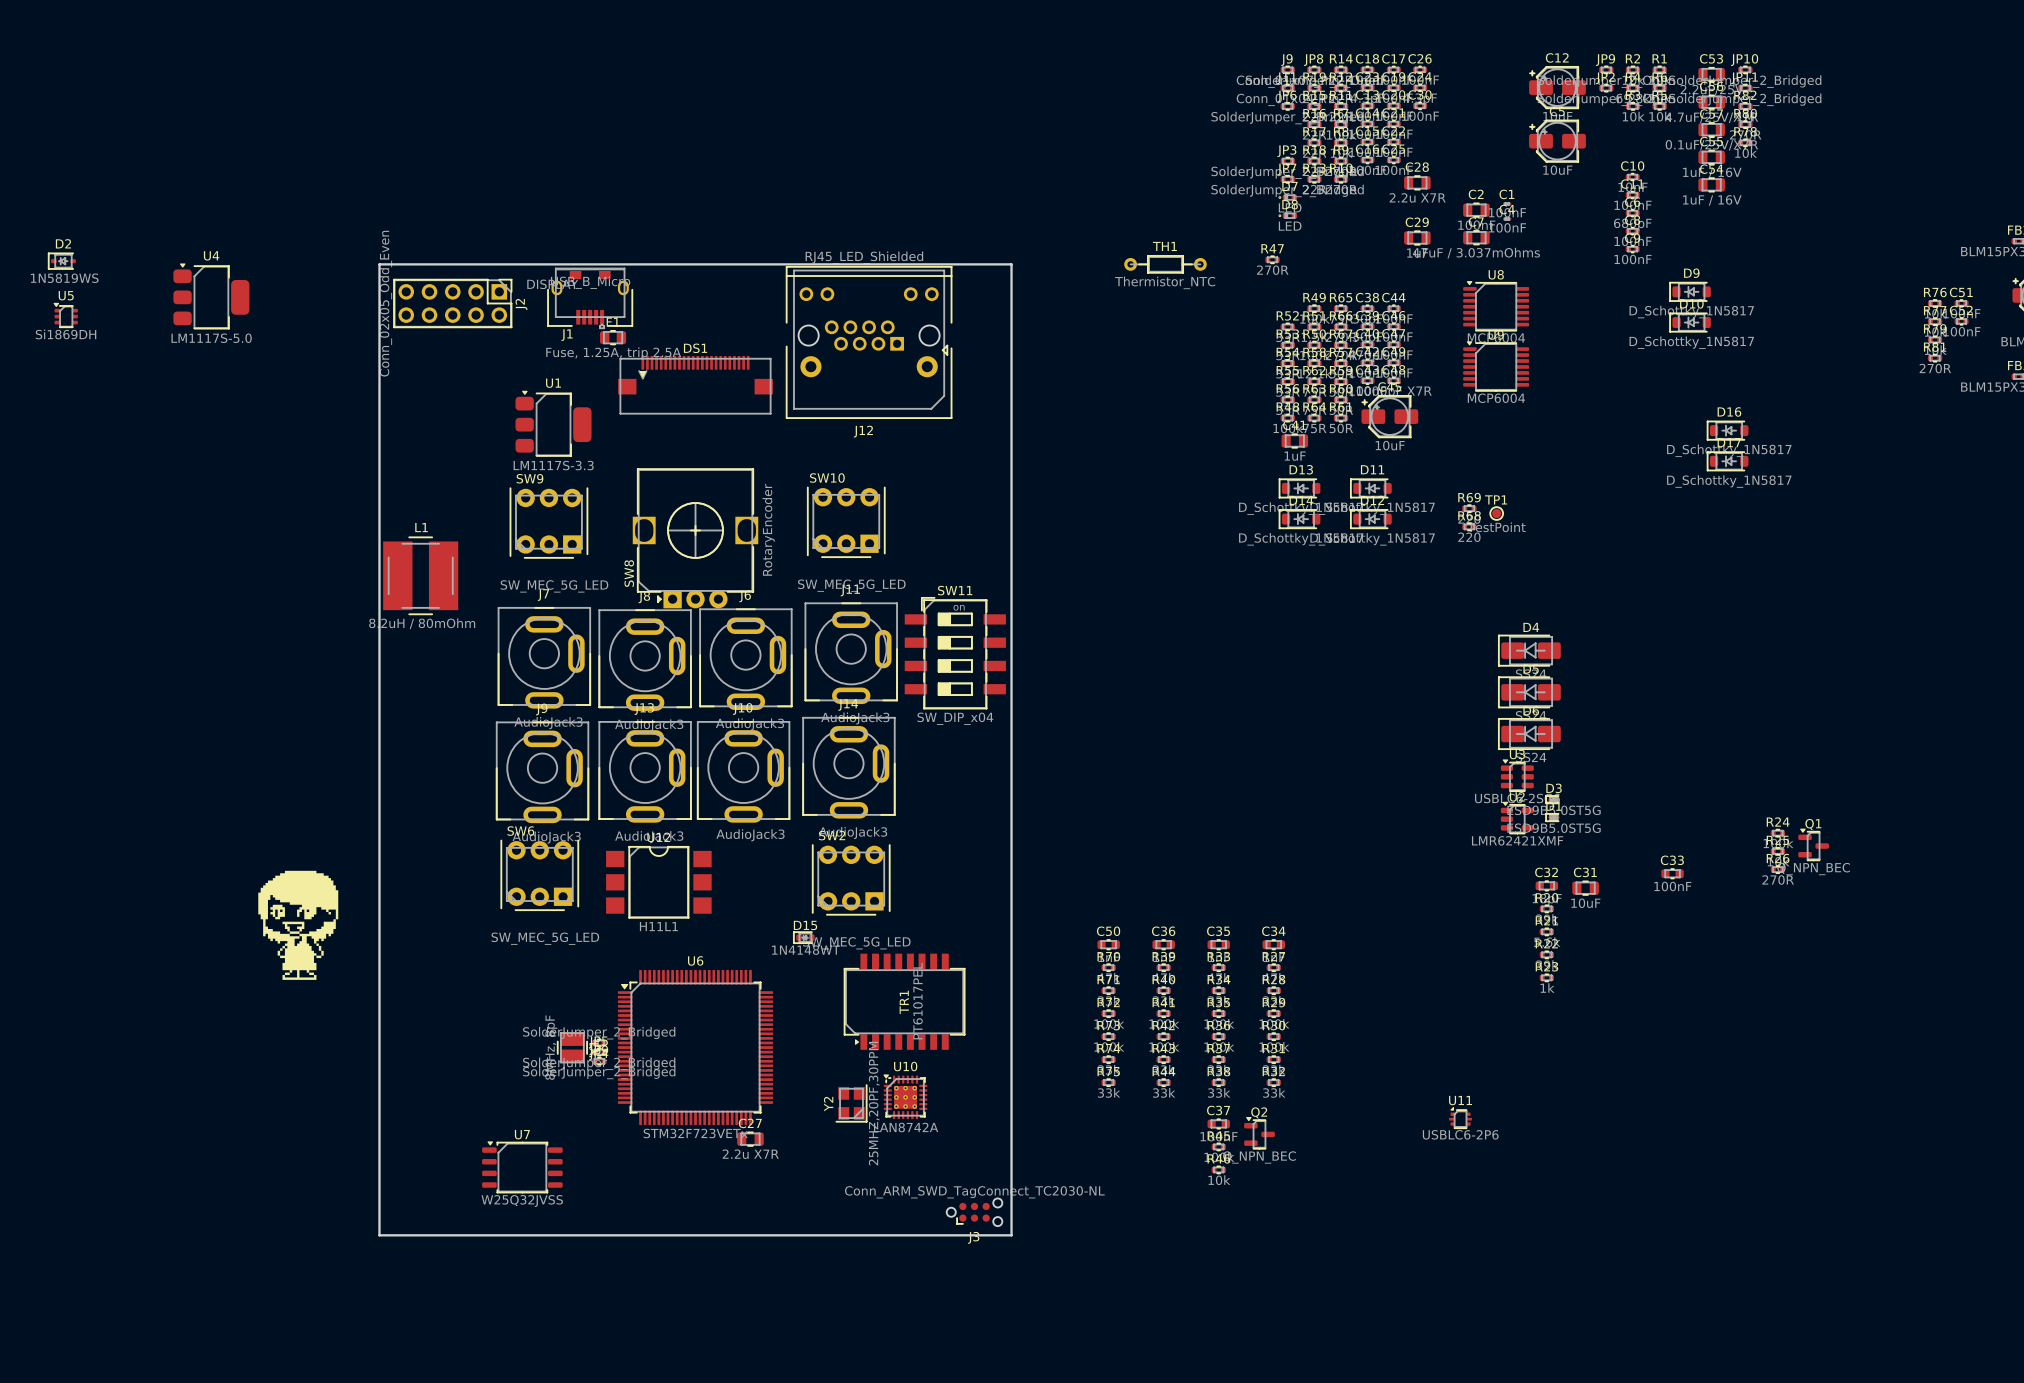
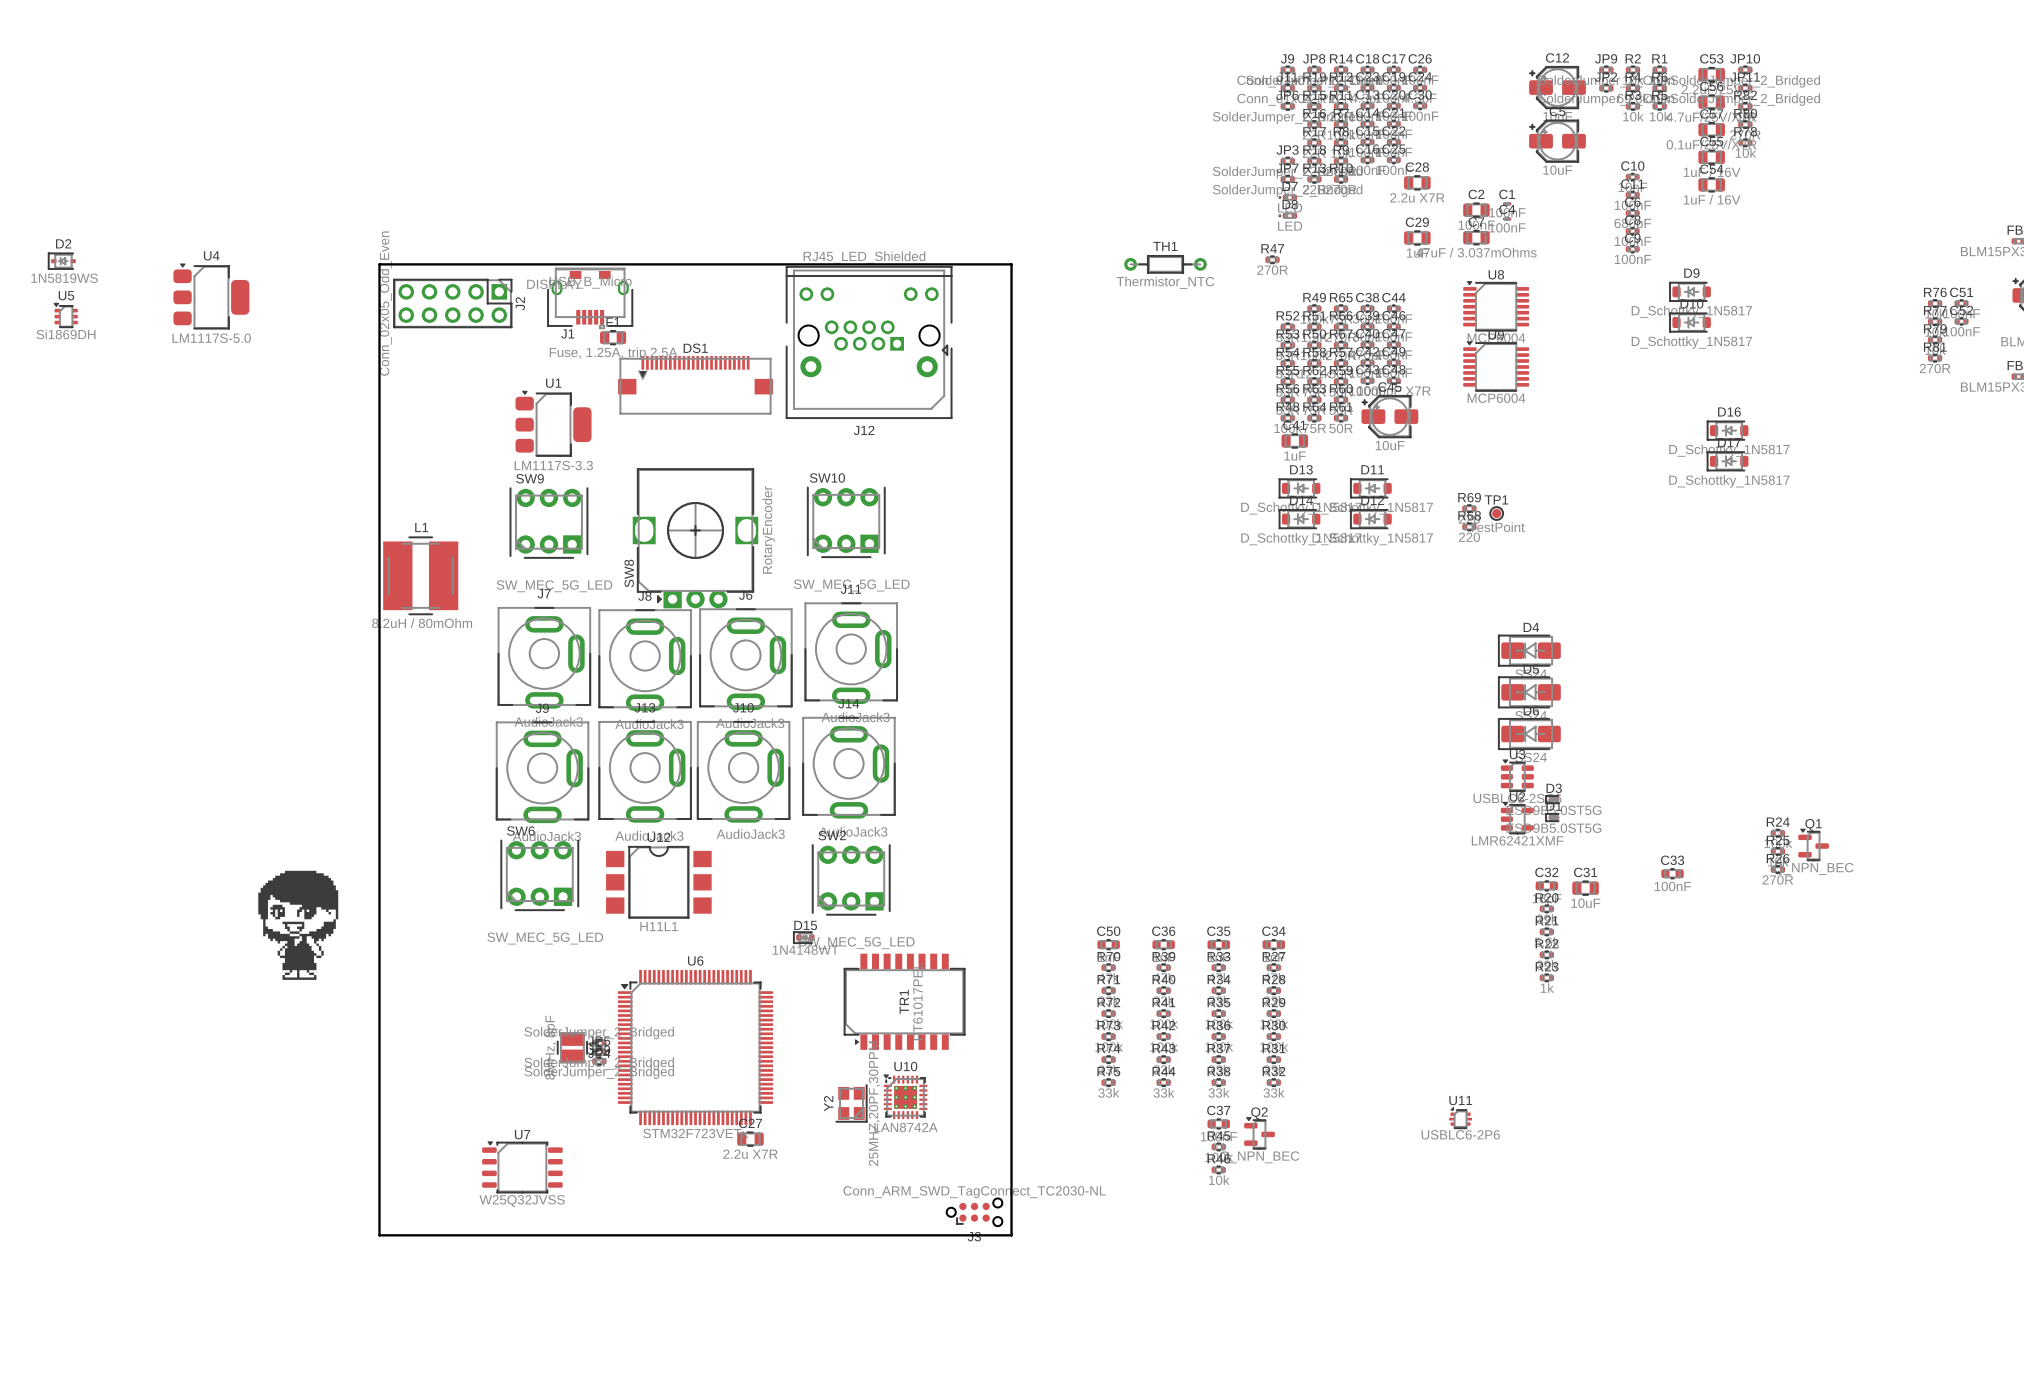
SW11: SW_DIP_x04 (955, 653) -> none

